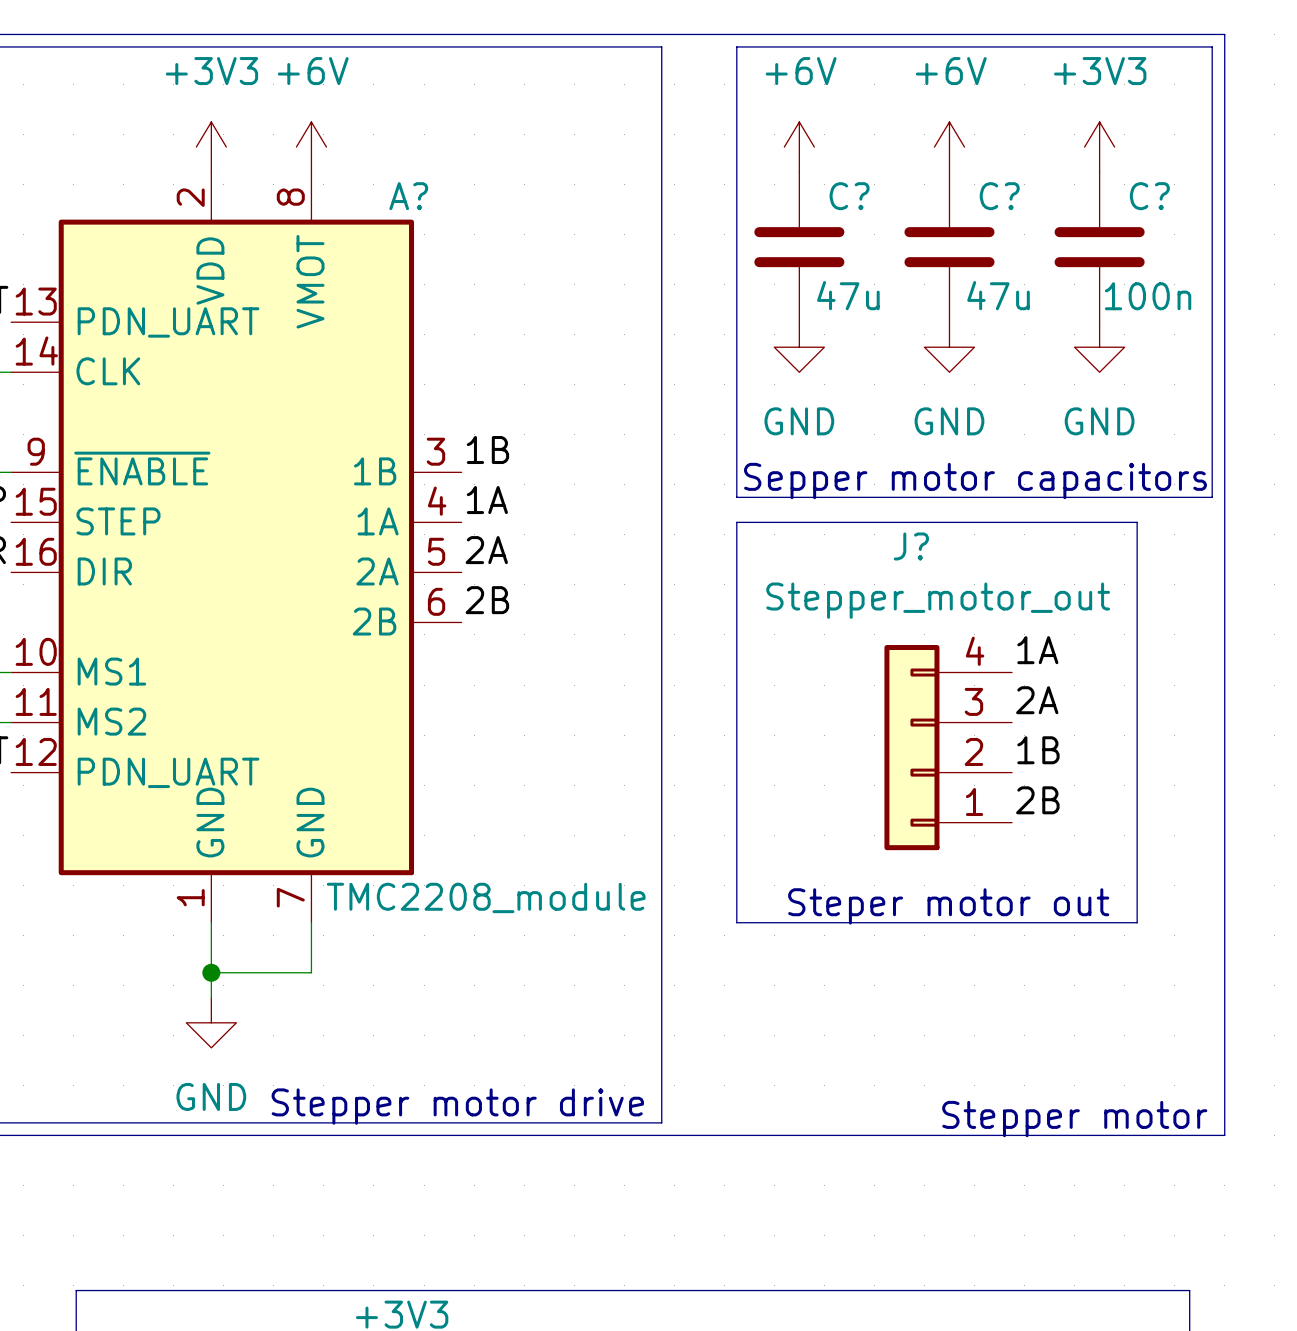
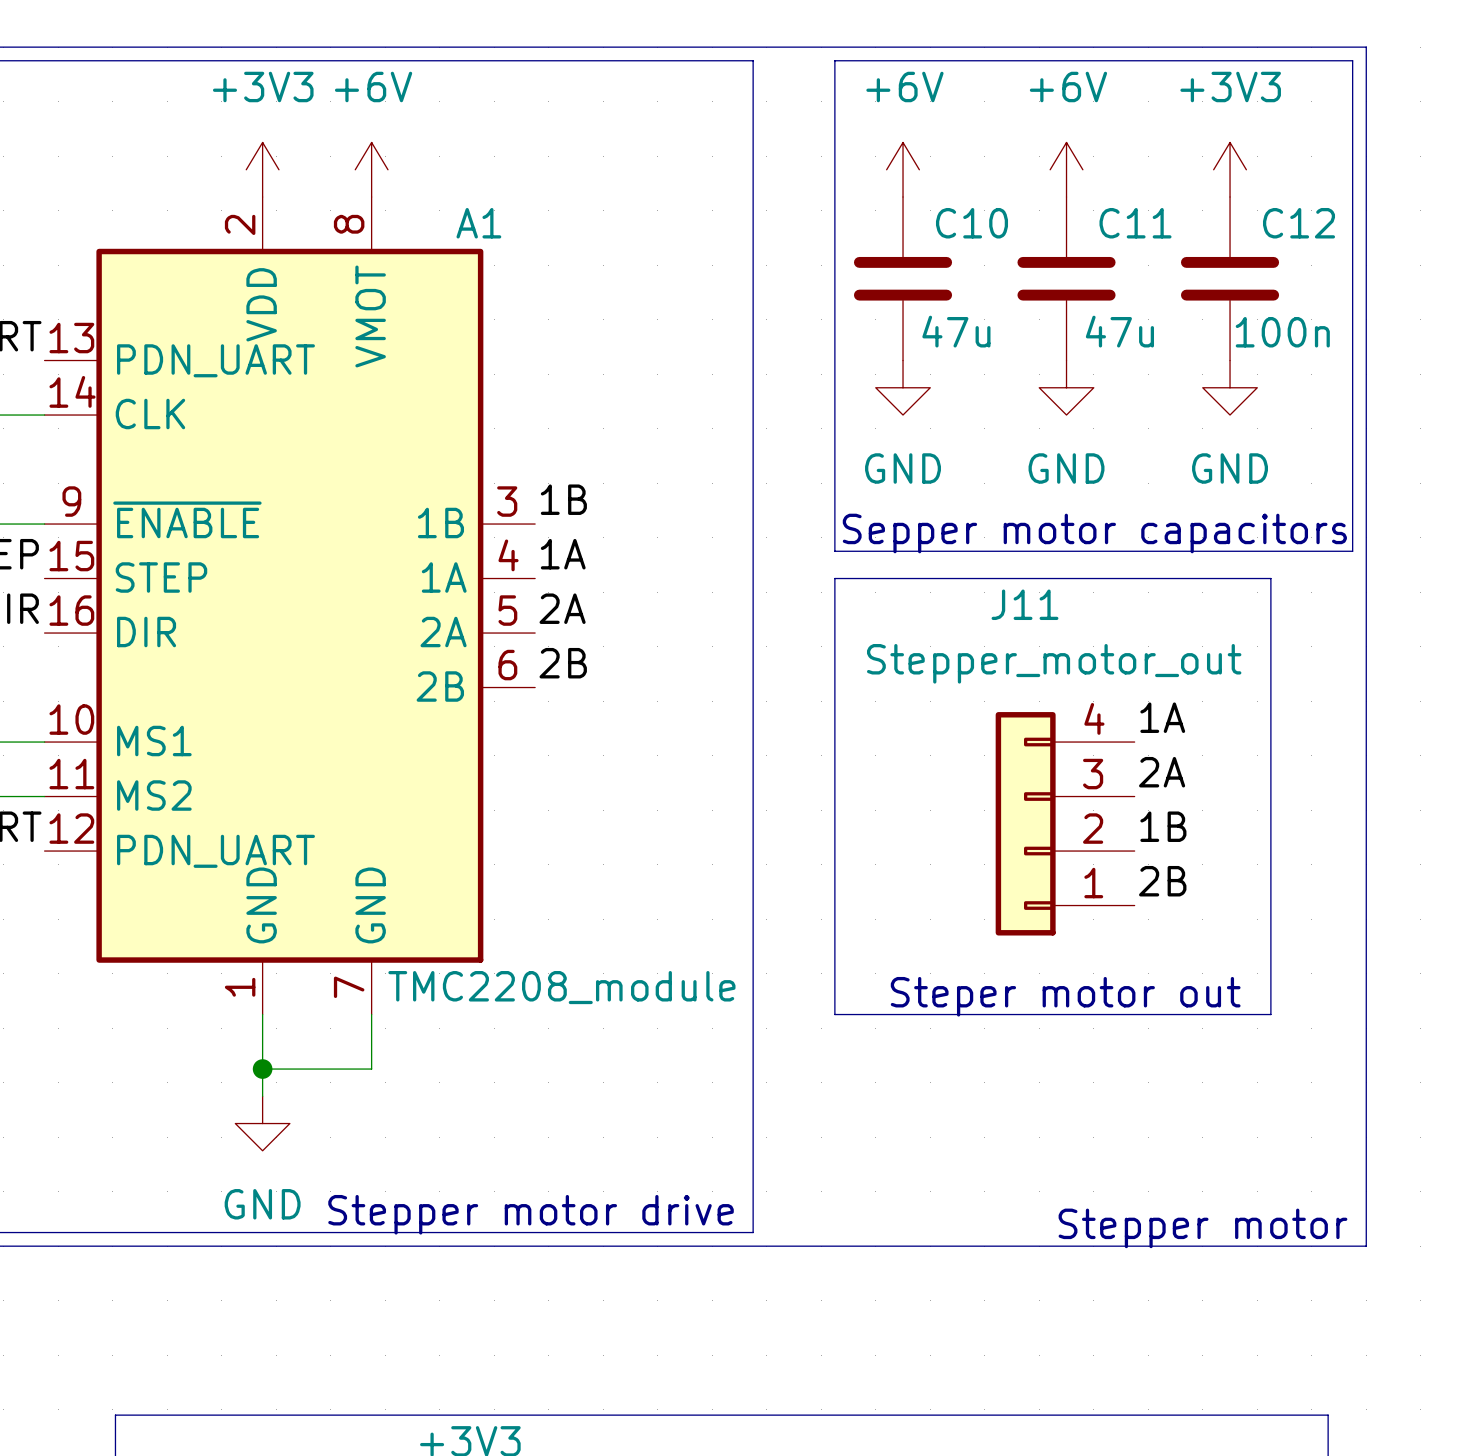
A? name: A? (408, 196) -> A1 (478, 223)
C? name: C? (849, 196) -> C10 (971, 223)
C? name: C? (999, 196) -> C11 (1135, 223)
C? name: C? (1149, 196) -> C12 (1299, 223)
J? name: J? (911, 546) -> J11 (1024, 604)

